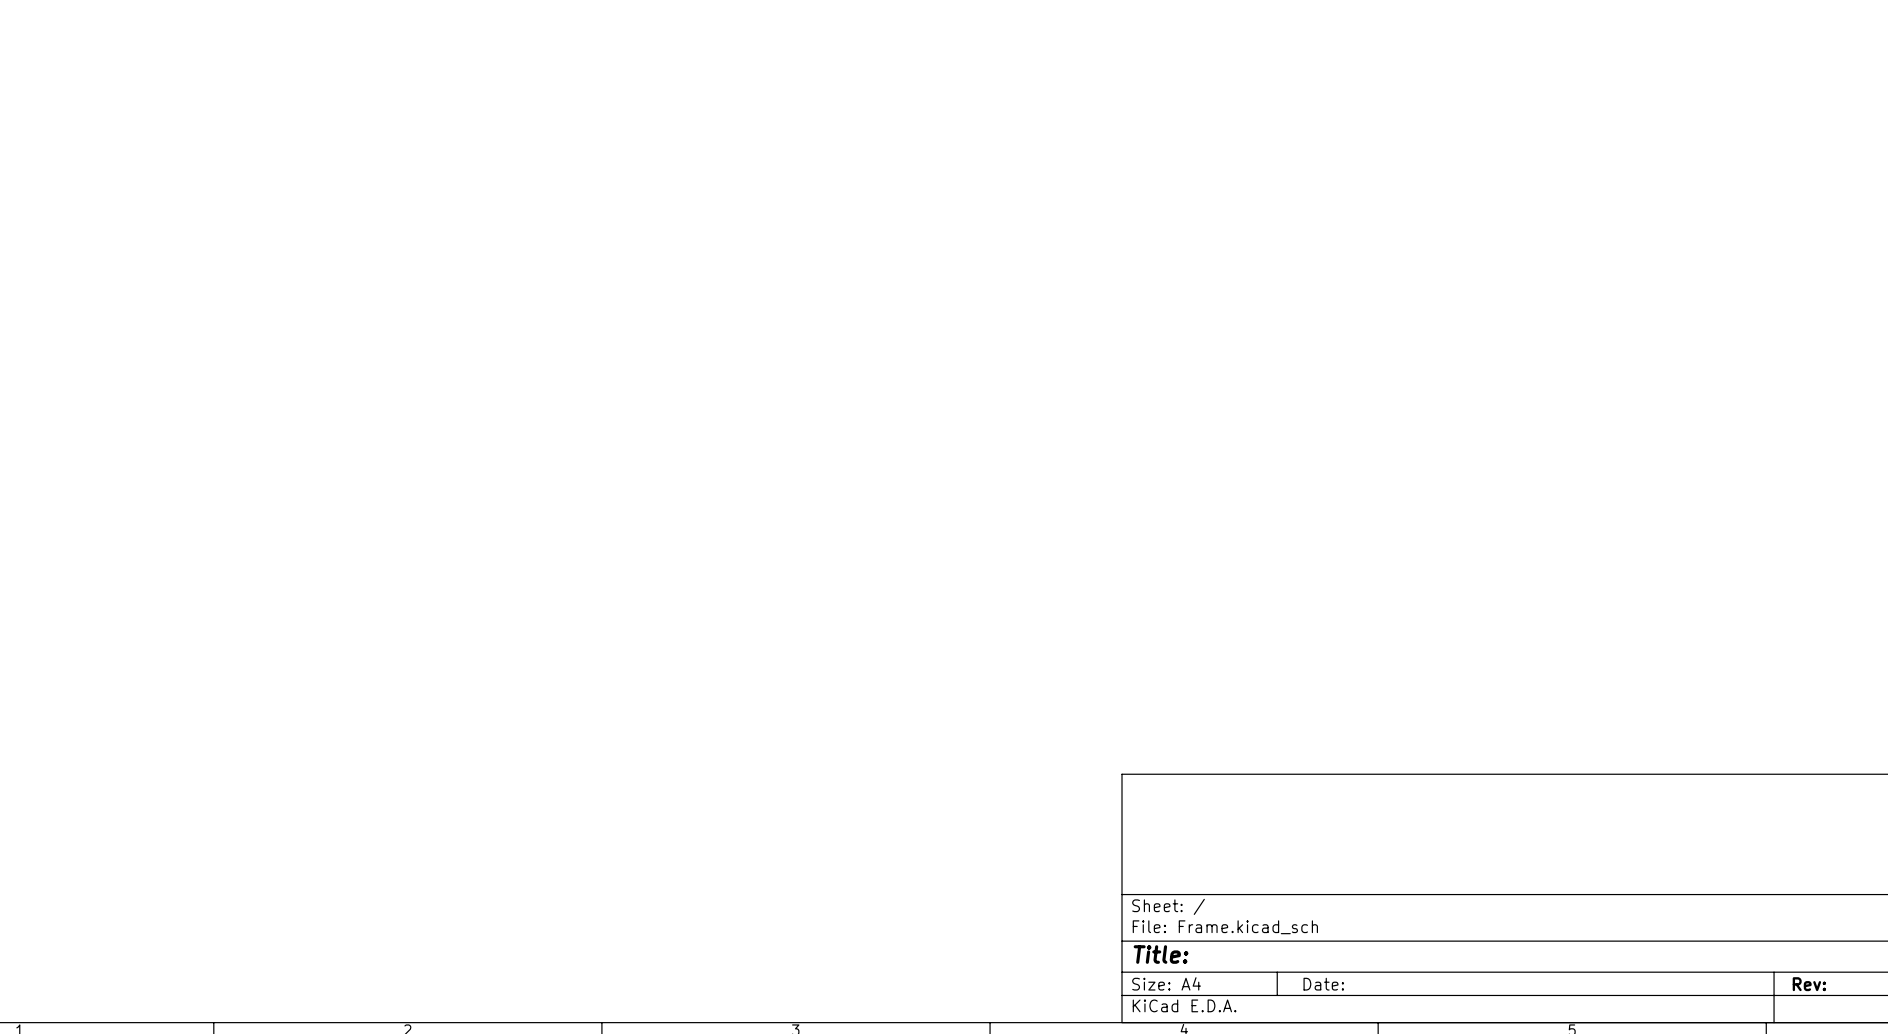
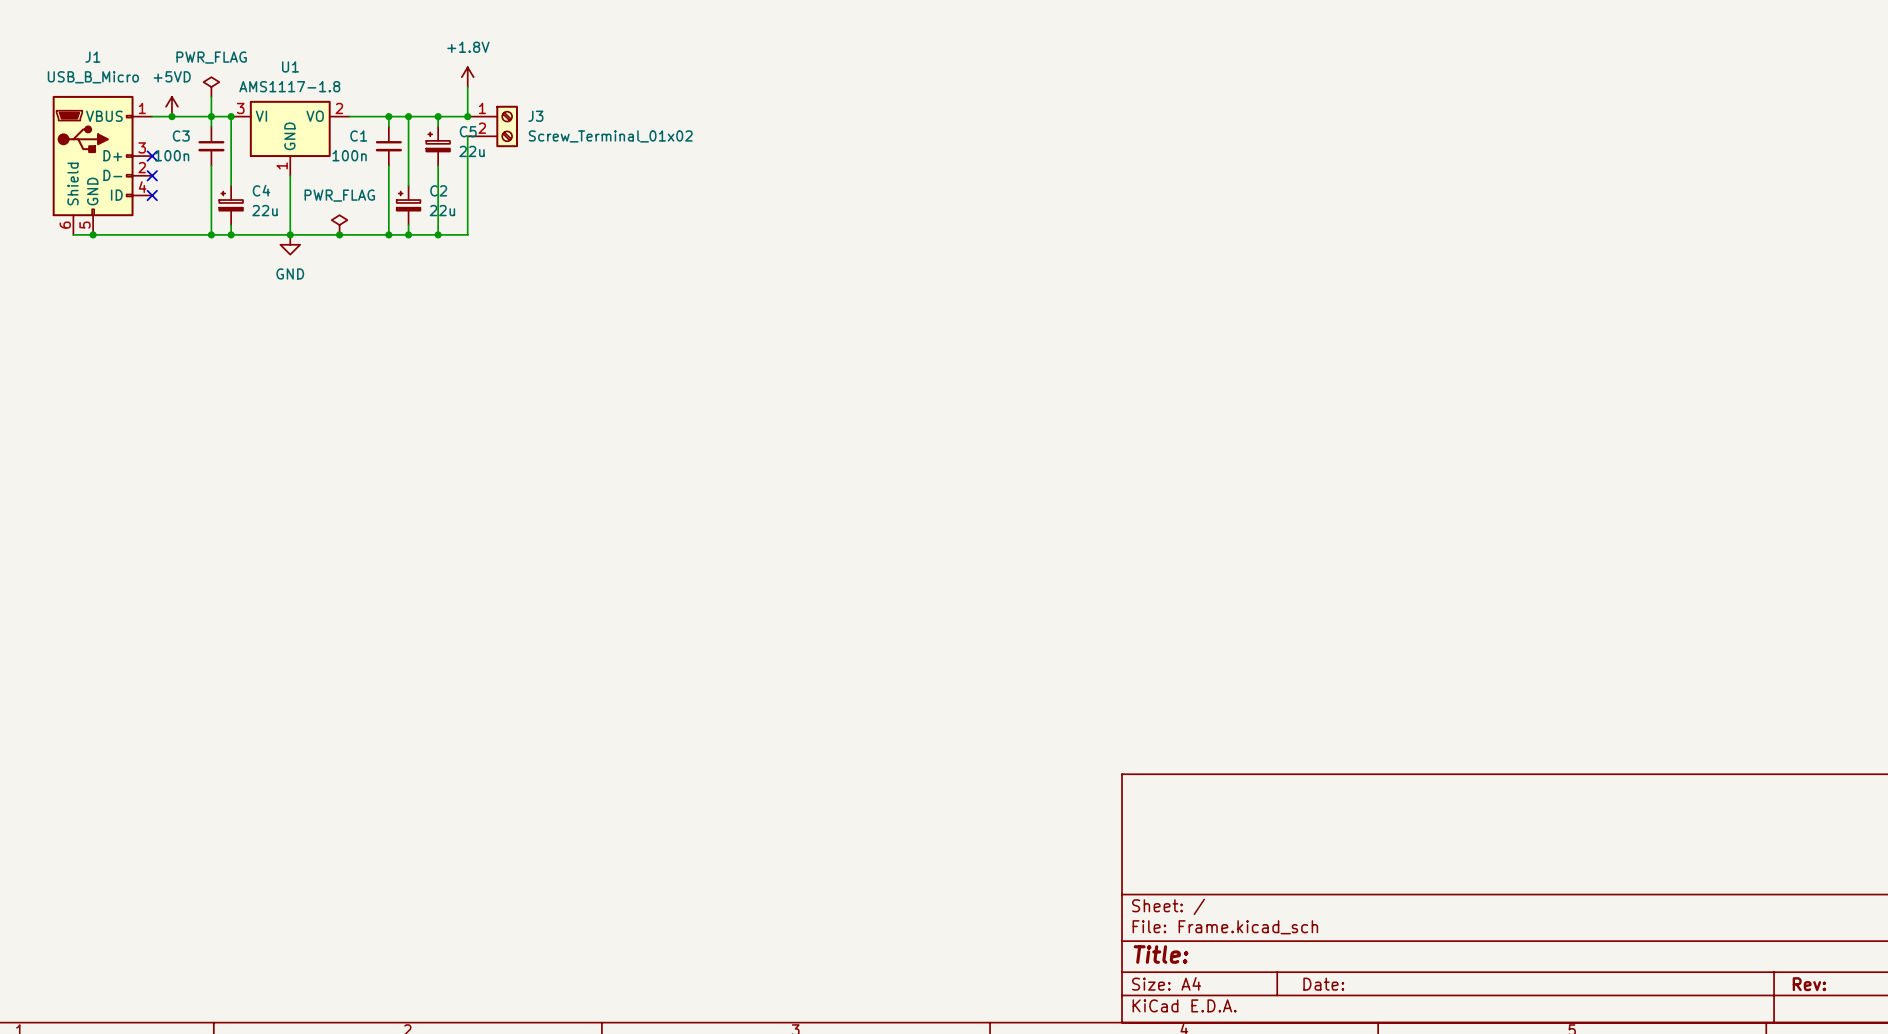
power symbol: none -> +1.8V (467, 77)
power symbol: none -> PWR_FLAG (211, 87)
wire: none -> (467, 87) (467, 116) (349, 116)
wire: none -> (211, 96) (211, 126)
power symbol: none -> +5VD (171, 106)
wire: none -> (152, 116) (231, 116) (231, 185)
junction: none -> (171, 116)
junction: none -> (211, 116)
junction: none -> (231, 116)
wire: none -> (388, 116) (388, 126)
junction: none -> (388, 116)
wire: none -> (408, 116) (408, 185)
junction: none -> (408, 116)
wire: none -> (438, 116) (438, 126)
junction: none -> (438, 116)
junction: none -> (467, 116)
J3: none -> Screw_Terminal_01x02 (492, 126)
wire: none -> (467, 136) (467, 234) (73, 234)
U1: none -> AMS1117-1.8 (290, 138)
C3: none -> 100n (211, 146)
C1: none -> 100n (388, 146)
C5: none -> 22u (438, 146)
no-connect mark: none -> (152, 156)
J1: none -> USB_B_Micro (102, 165)
wire: none -> (211, 165) (211, 234)
wire: none -> (388, 165) (388, 234)
wire: none -> (438, 165) (438, 234)
no-connect mark: none -> (152, 175)
wire: none -> (290, 175) (290, 234)
no-connect mark: none -> (152, 195)
C4: none -> 22u (231, 205)
C2: none -> 22u (408, 205)
wire: none -> (231, 225) (231, 234)
power symbol: none -> PWR_FLAG (339, 225)
wire: none -> (408, 225) (408, 234)
junction: none -> (93, 234)
junction: none -> (211, 234)
junction: none -> (231, 234)
junction: none -> (290, 234)
junction: none -> (339, 234)
junction: none -> (388, 234)
junction: none -> (408, 234)
junction: none -> (438, 234)
power symbol: none -> GND (290, 244)

